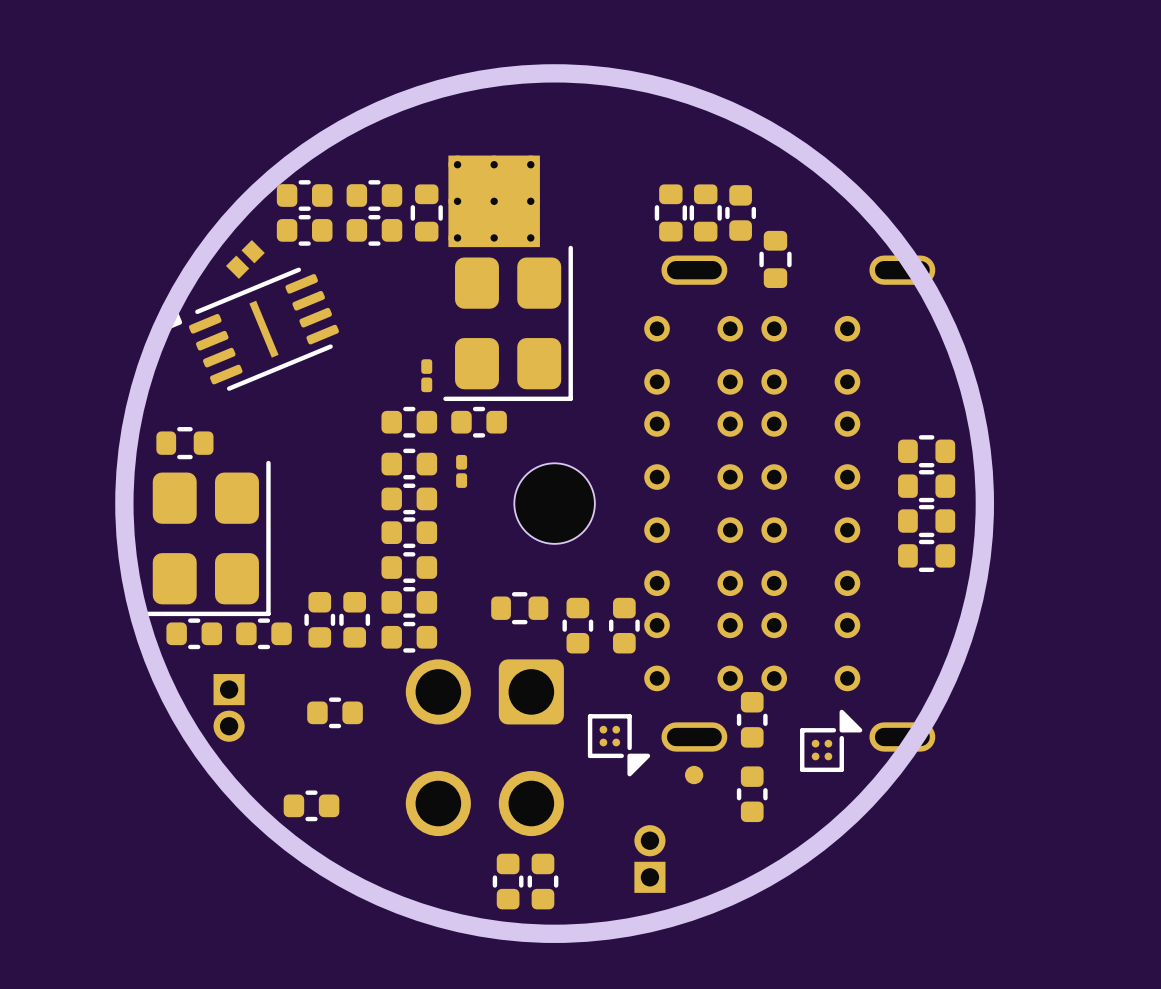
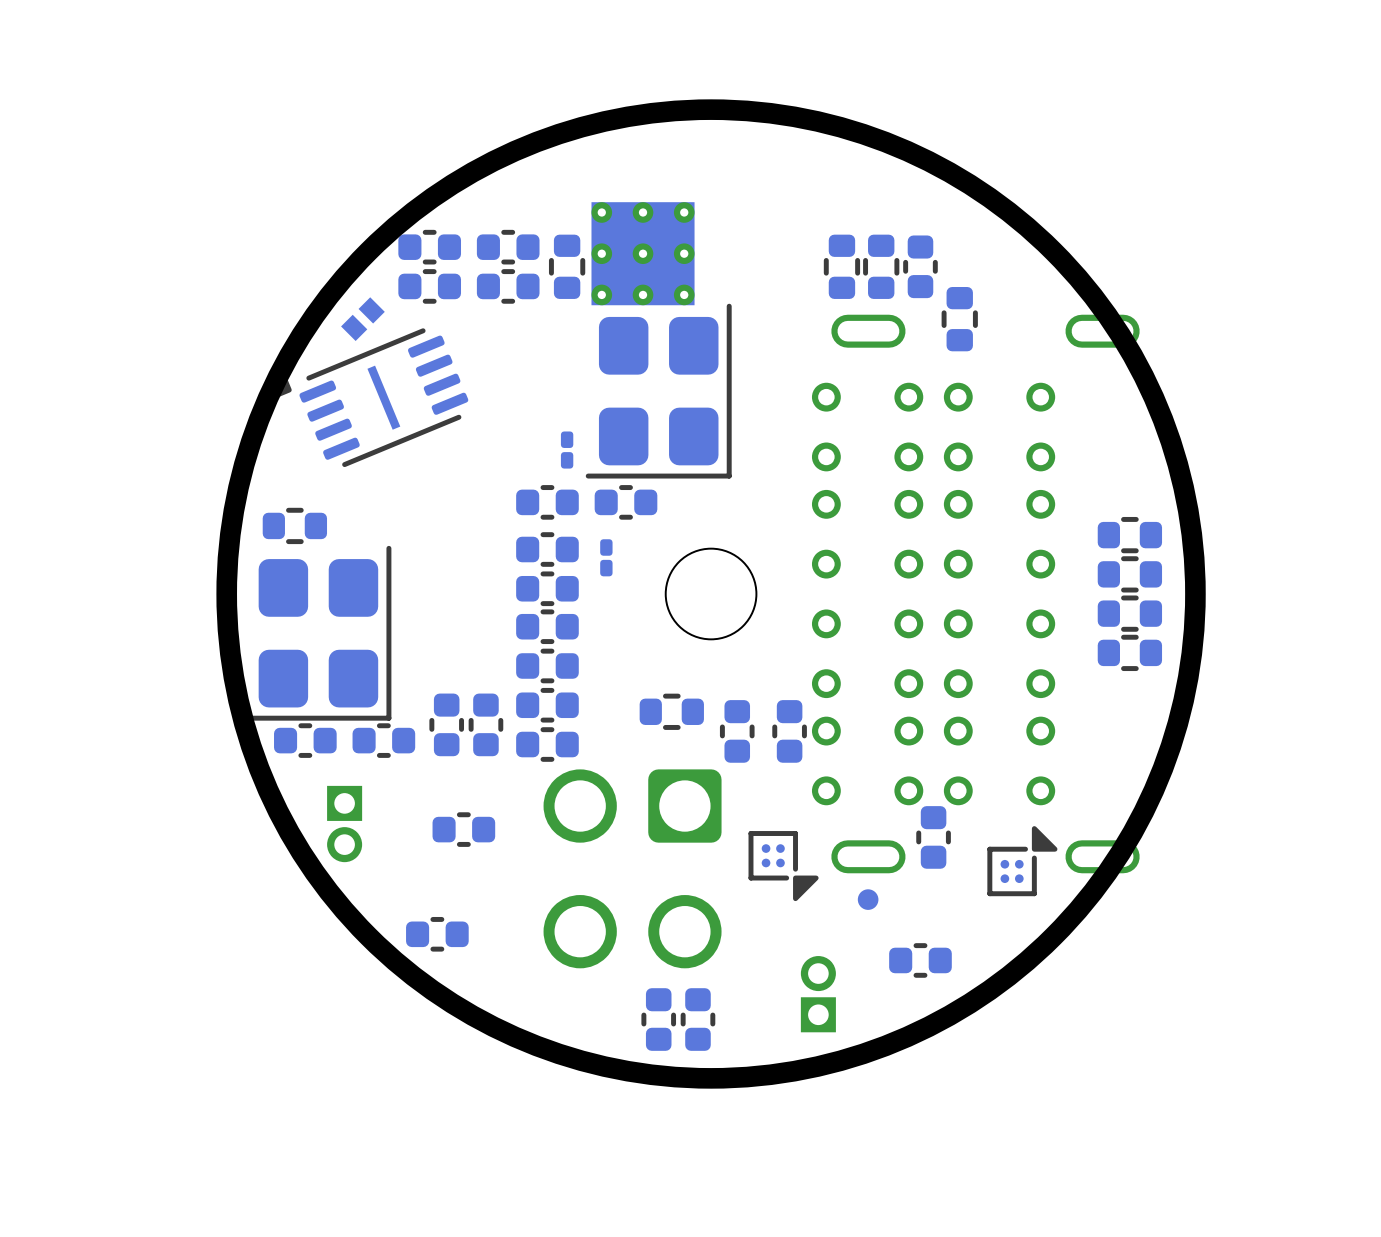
part rotation: 0° (752, 794) -> 90° clockwise (920, 960)
part position: (752, 794) -> (920, 960)

